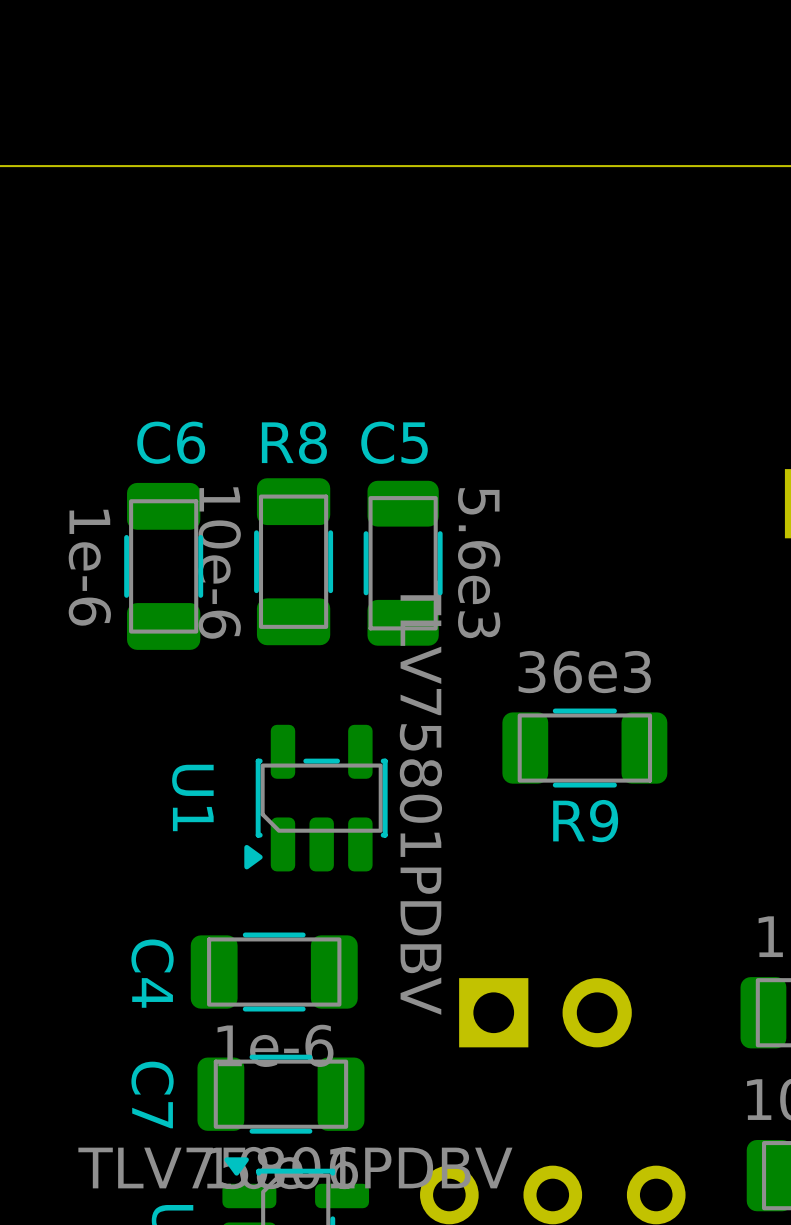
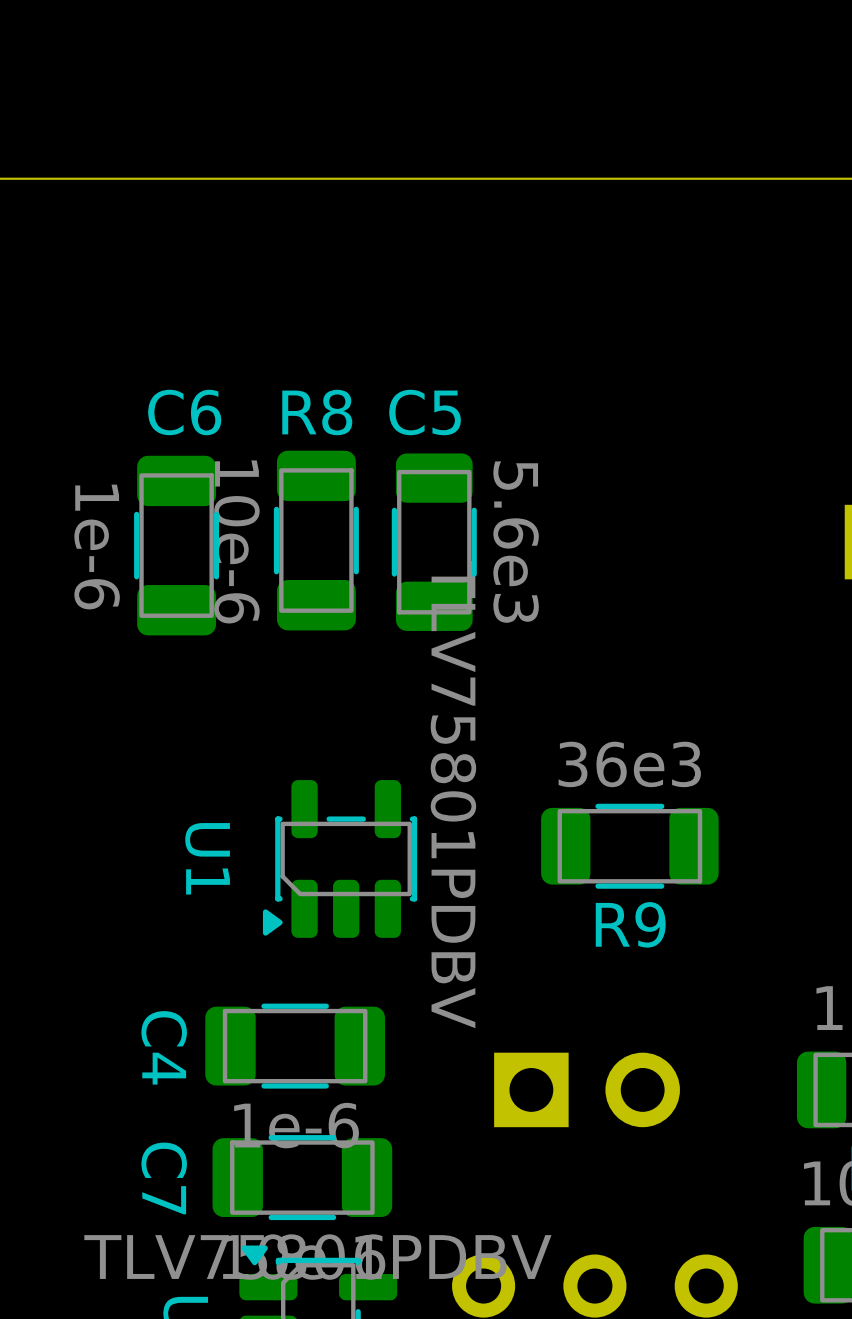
C5 position: (293, 561) -> (316, 540)
R8 position: (403, 563) -> (434, 542)
C6 position: (163, 566) -> (176, 545)
R9 position: (584, 748) -> (629, 846)
U1 value position: TLV75801PDBV (420, 797) -> TLV75801PDBV (453, 794)

